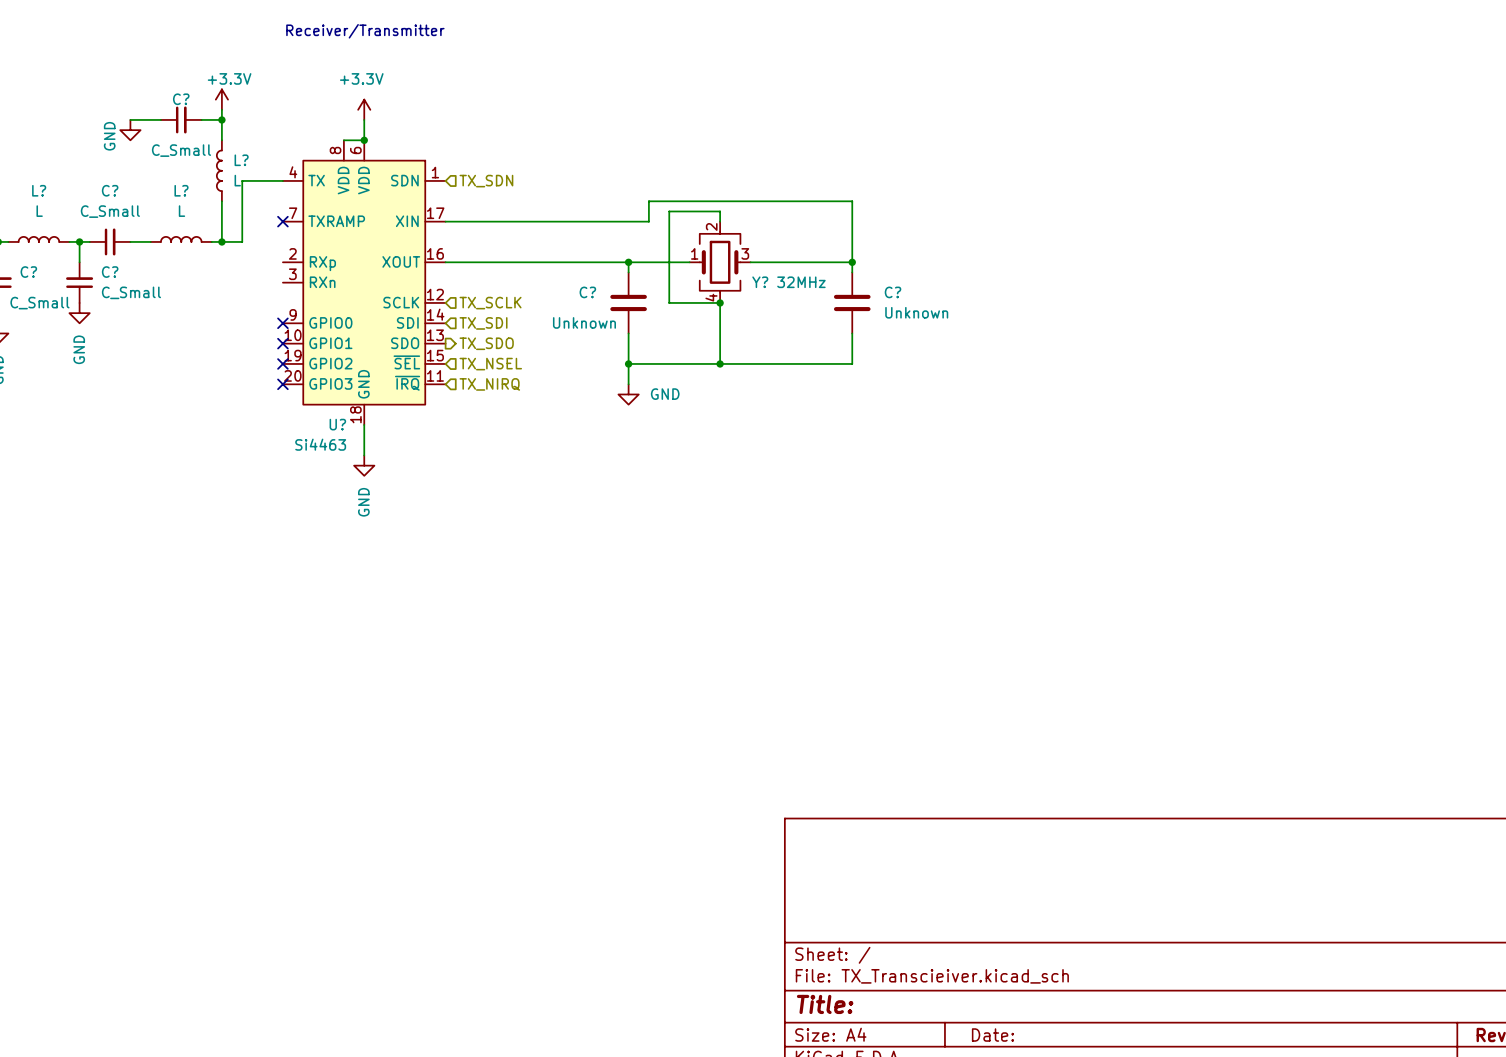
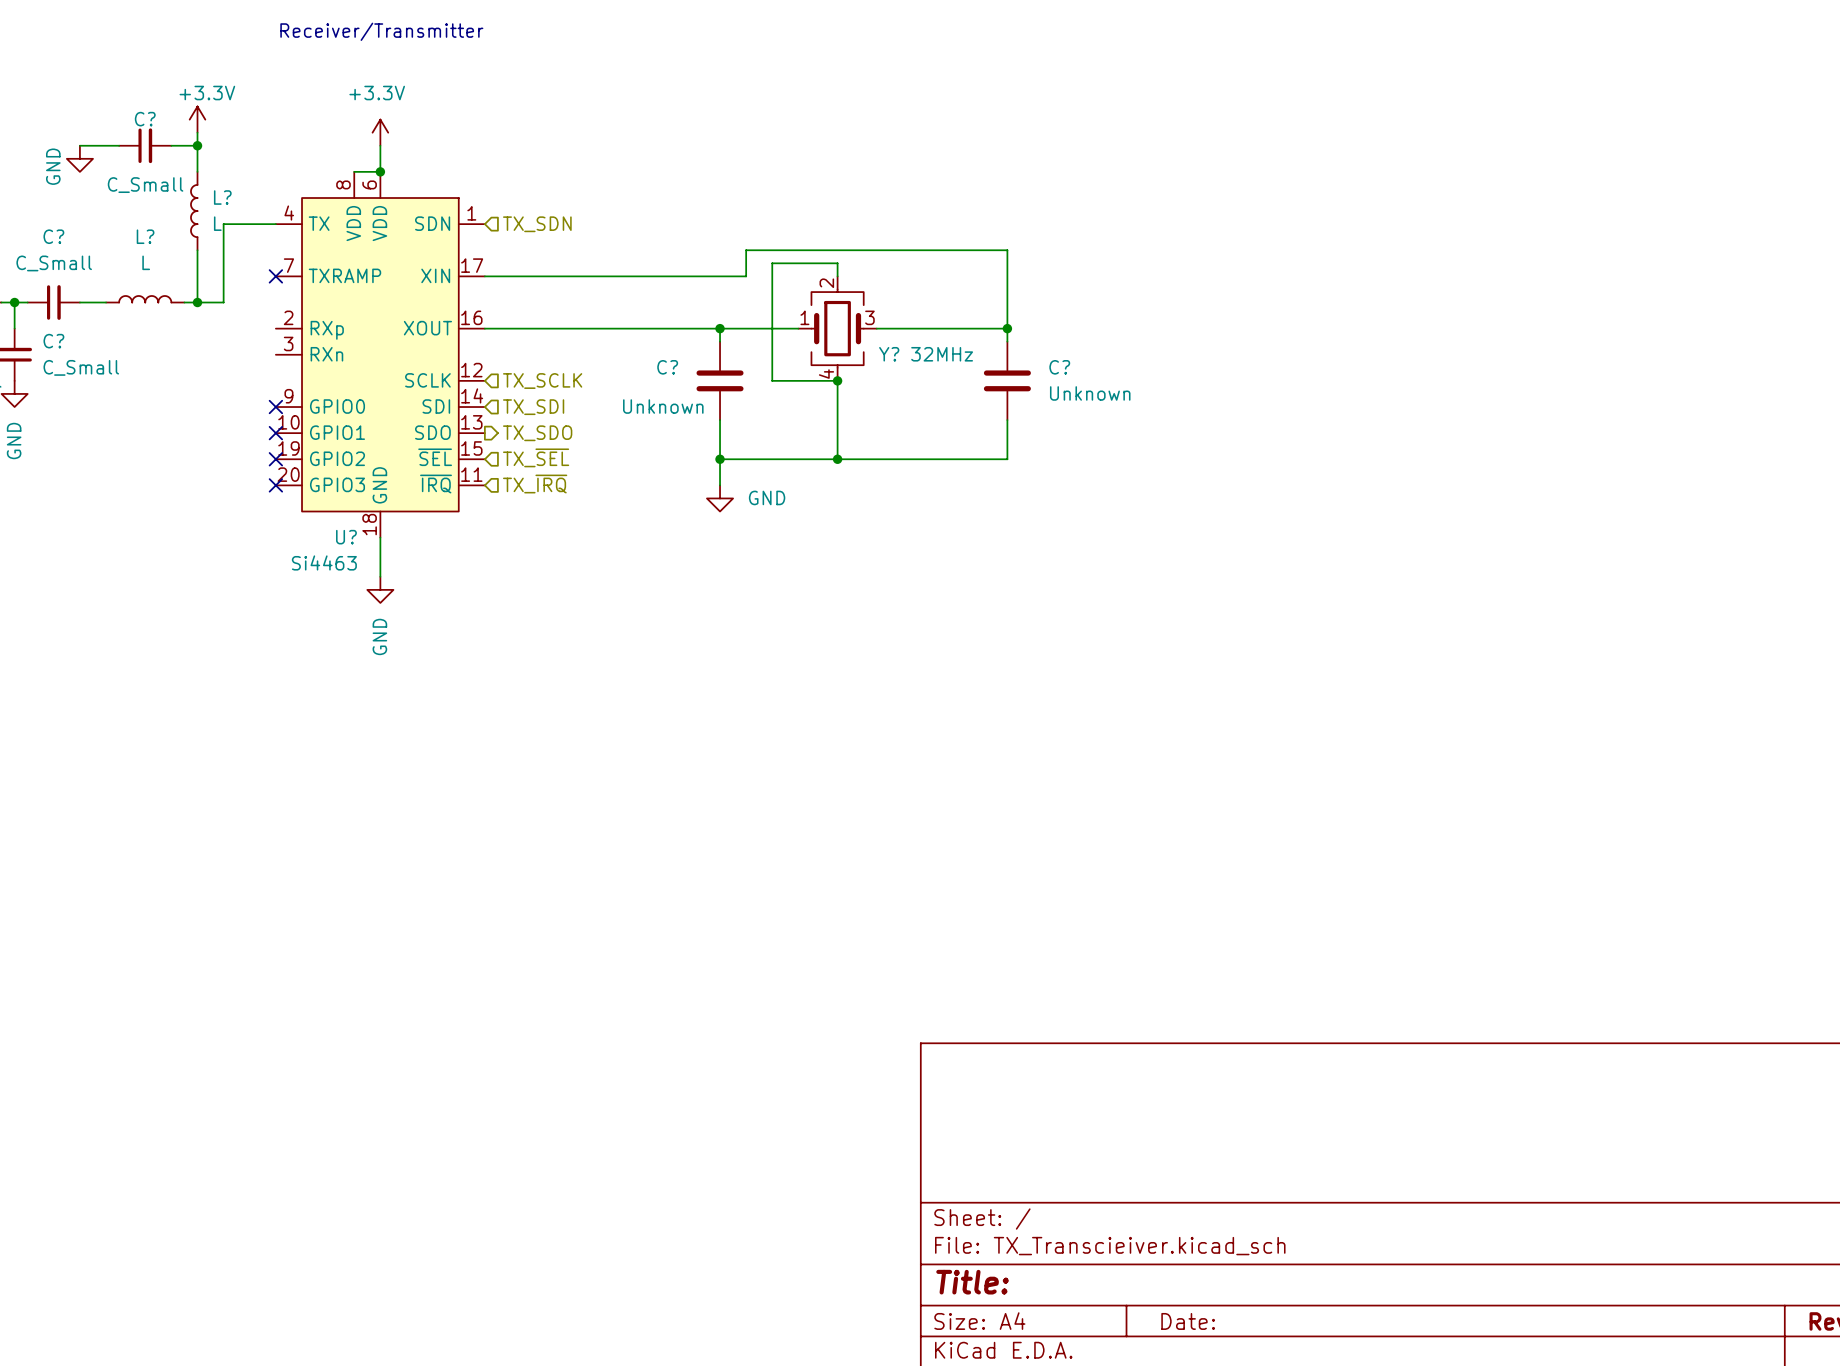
hierarchical label: TX_NSEL (490, 364) -> TX_~{SEL} (536, 457)
hierarchical label: TX_NIRQ (489, 384) -> TX_~{IRQ} (535, 484)

